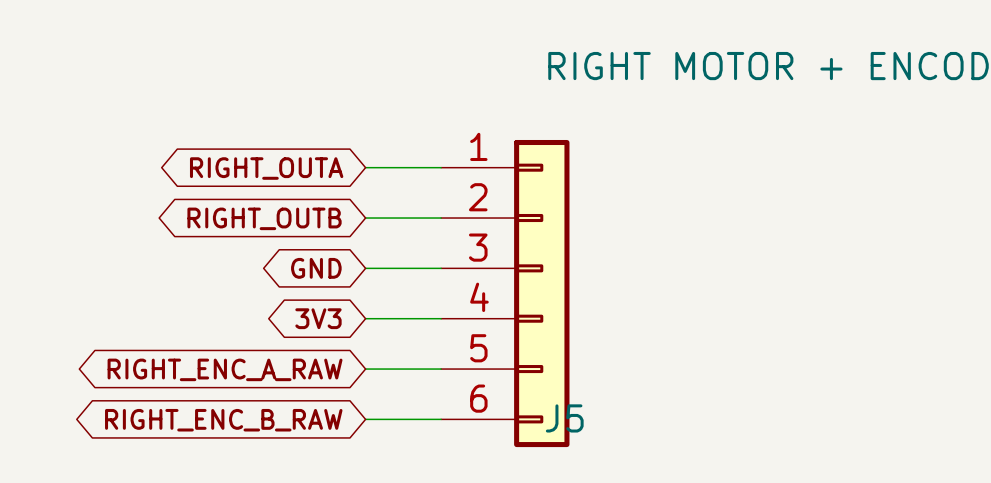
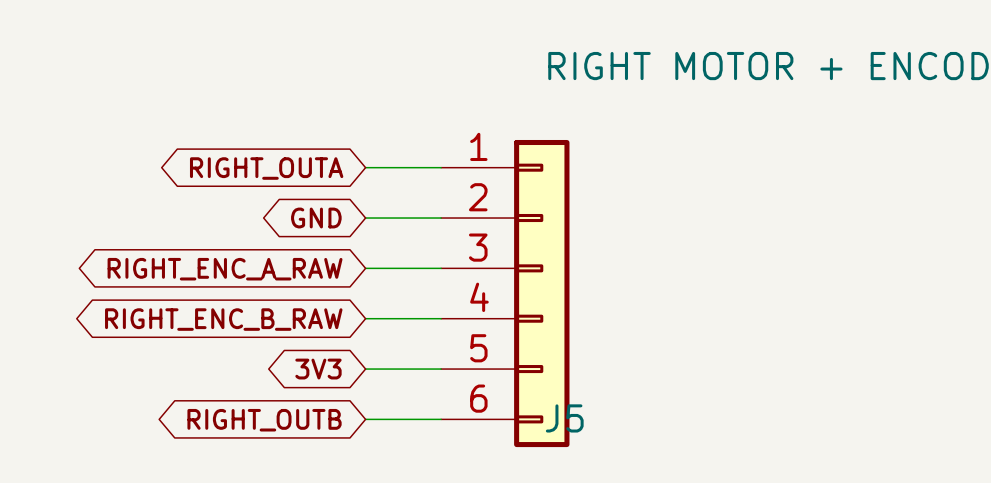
global label: RIGHT_OUTB (264, 218) -> GND (316, 218)
global label: GND (316, 268) -> RIGHT_ENC_A_RAW (225, 269)
global label: 3V3 (318, 318) -> RIGHT_ENC_B_RAW (223, 319)
global label: RIGHT_ENC_A_RAW (225, 369) -> 3V3 (318, 369)
global label: RIGHT_ENC_B_RAW (223, 420) -> RIGHT_OUTB (264, 420)

